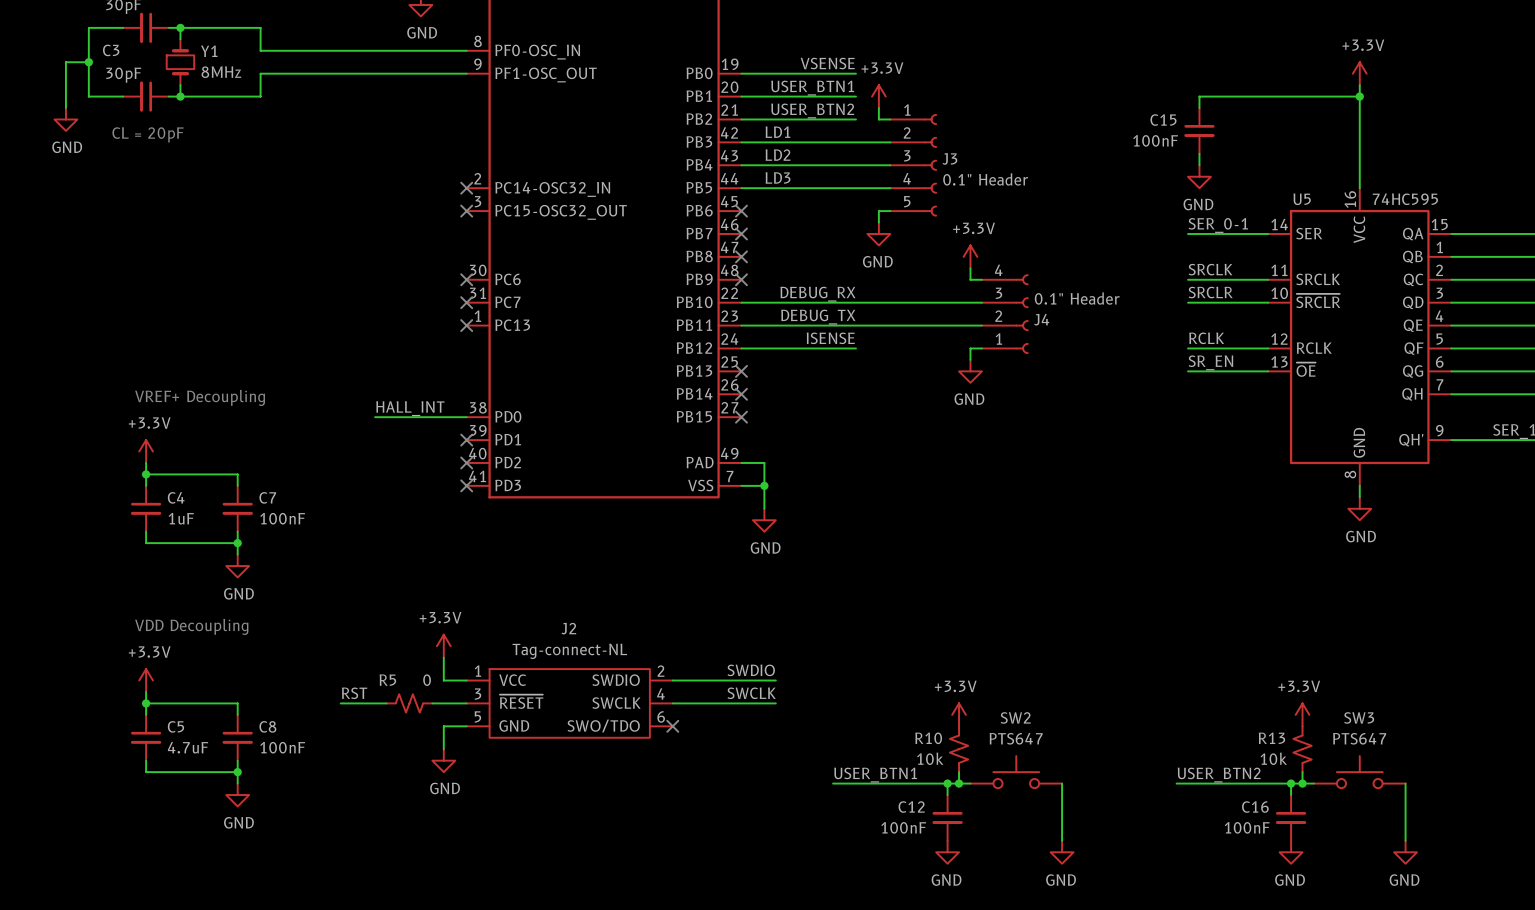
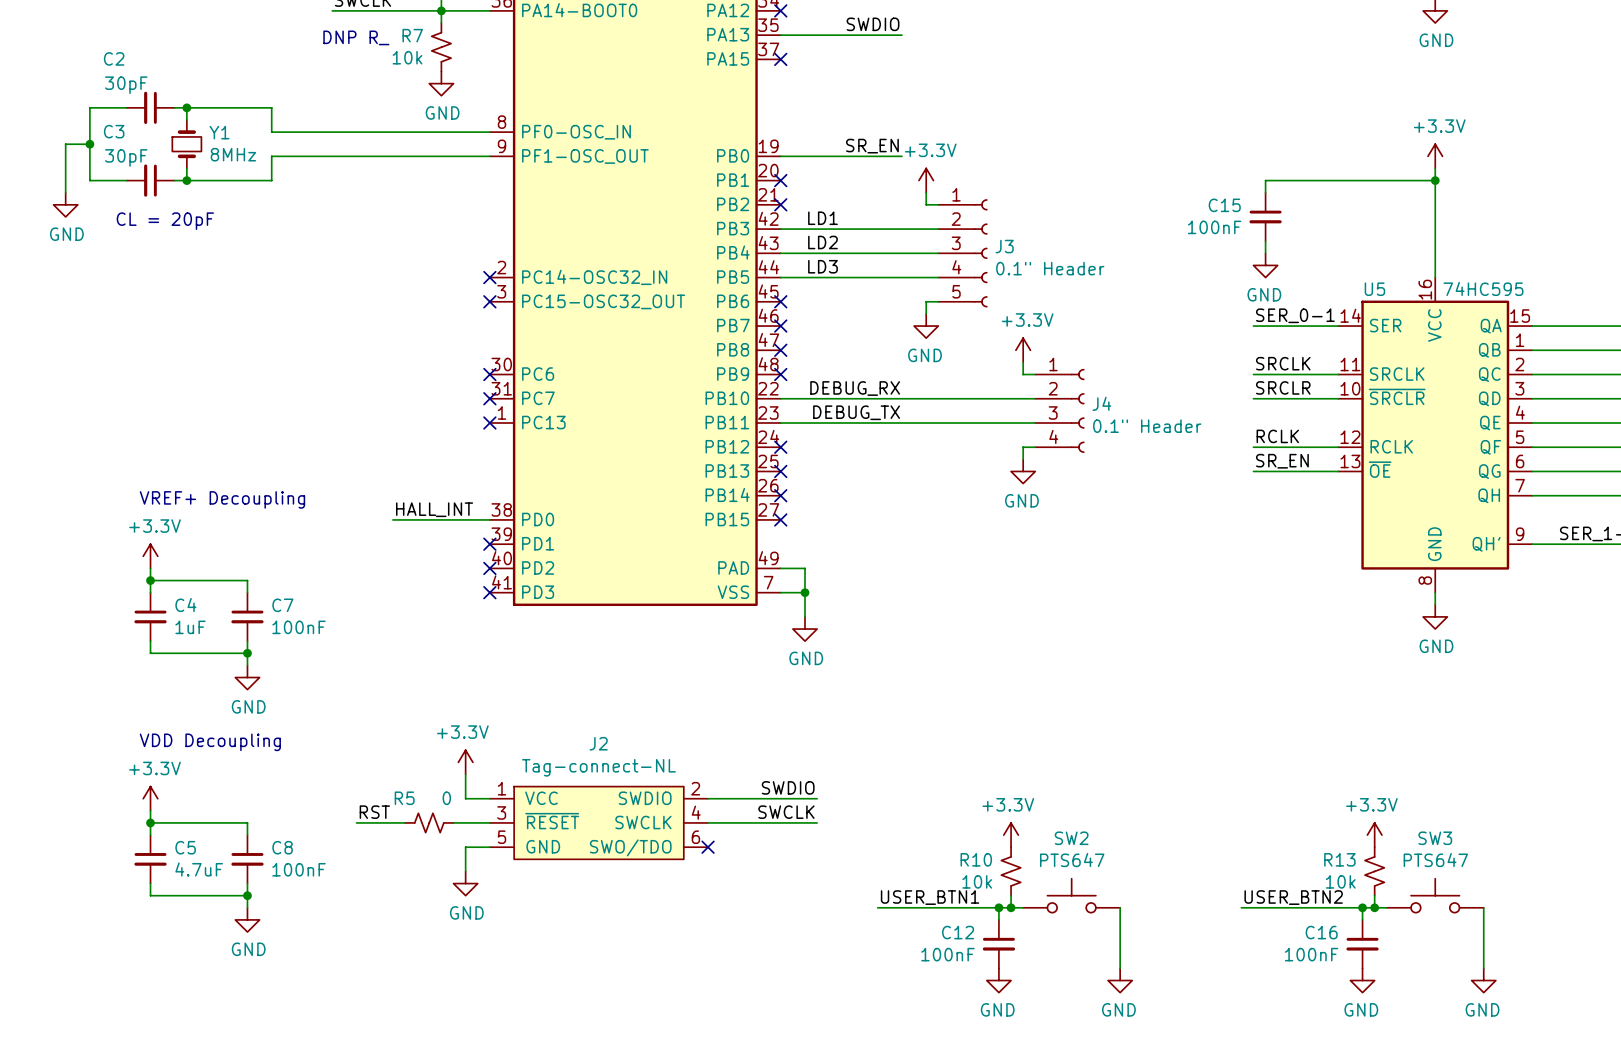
label: VSENSE (827, 63) -> SR_EN (872, 146)
label: USER_BTN1 (812, 88) -> none
wire: (741, 96) (855, 96) -> none
no-connect mark: none -> (780, 180)
label: USER_BTN2 (812, 110) -> none
wire: (741, 119) (855, 119) -> none
no-connect mark: none -> (780, 204)
J4 flip: as is (1022, 314) -> up-down (1077, 410)
label: ISENSE (830, 338) -> none
wire: (741, 348) (855, 348) -> none
no-connect mark: none -> (780, 447)

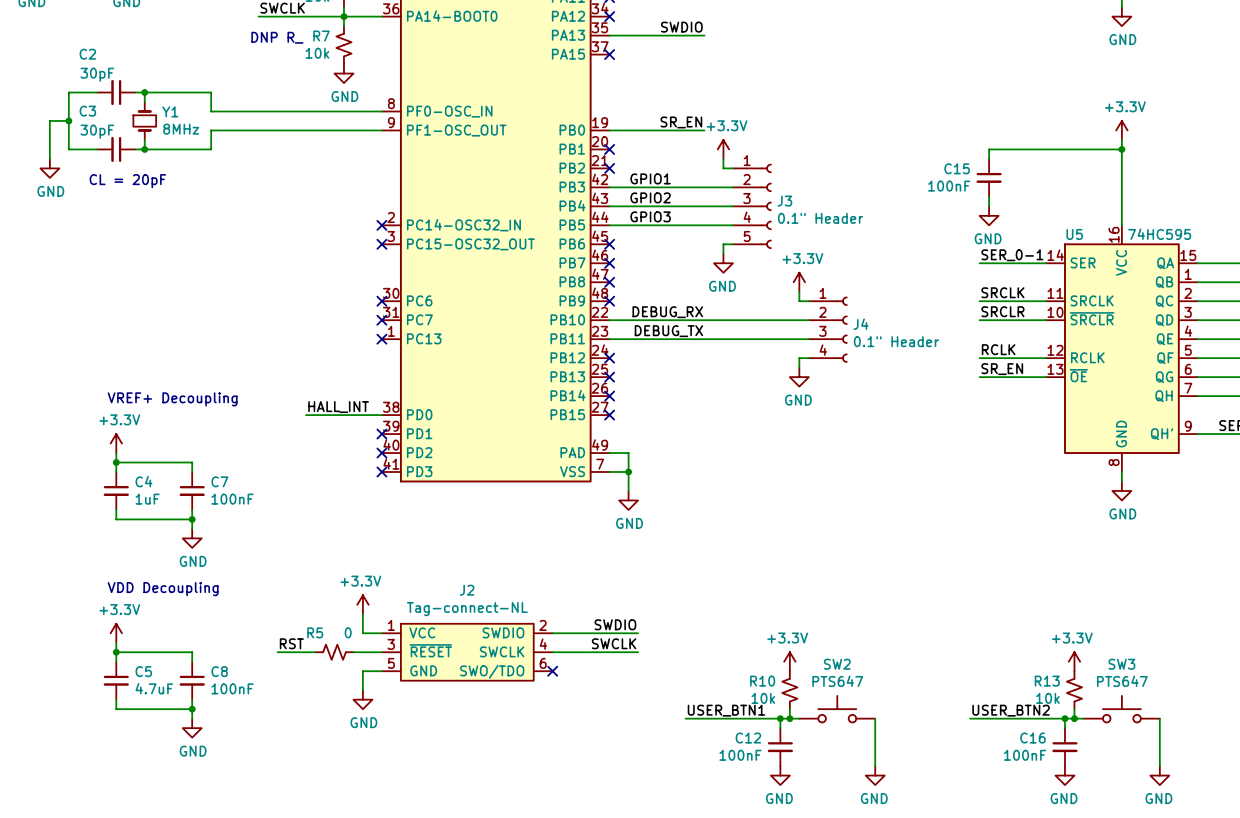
label: LD1 (822, 218) -> GPIO1 (650, 178)
label: LD2 (822, 242) -> GPIO2 (650, 197)
label: LD3 (822, 266) -> GPIO3 (650, 216)

